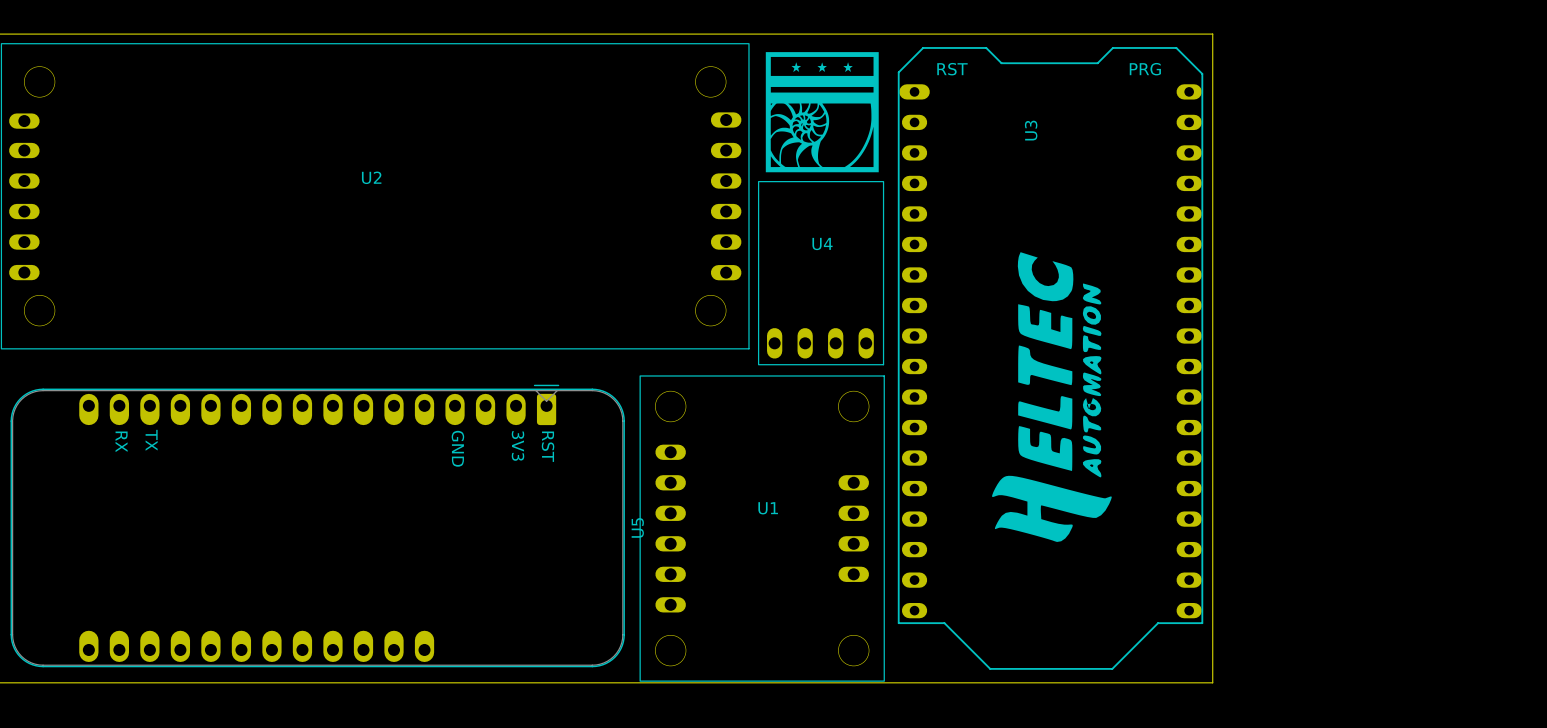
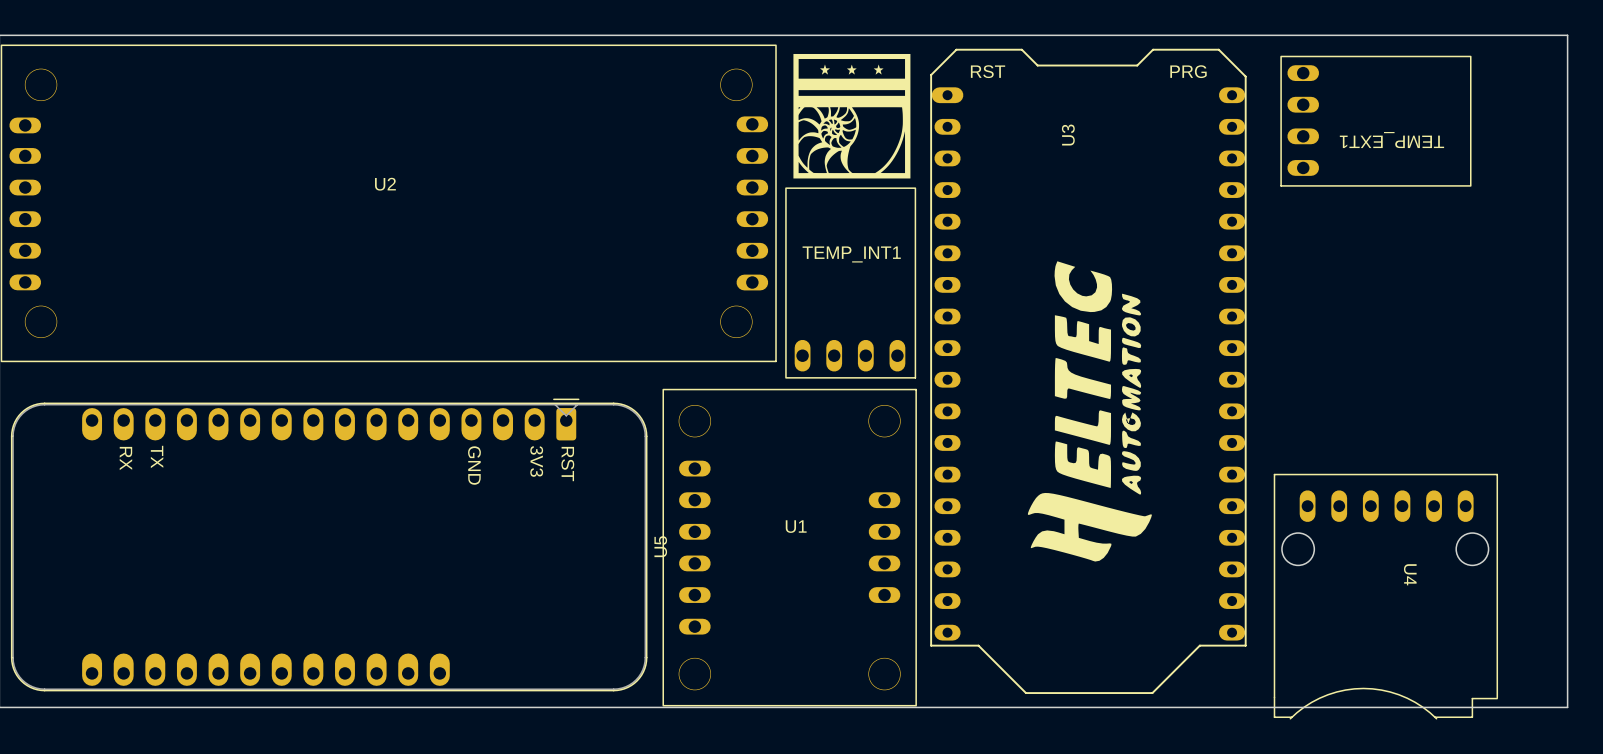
board edge: (1212, 34) (1212, 682) -> (1256, 35) (1567, 35) (1567, 707) (1256, 707)
TEMP_EXT1: none -> (1375, 121)
U4 name: U4 (822, 243) -> TEMP_INT1 (851, 254)
U4: none -> (1385, 596)

